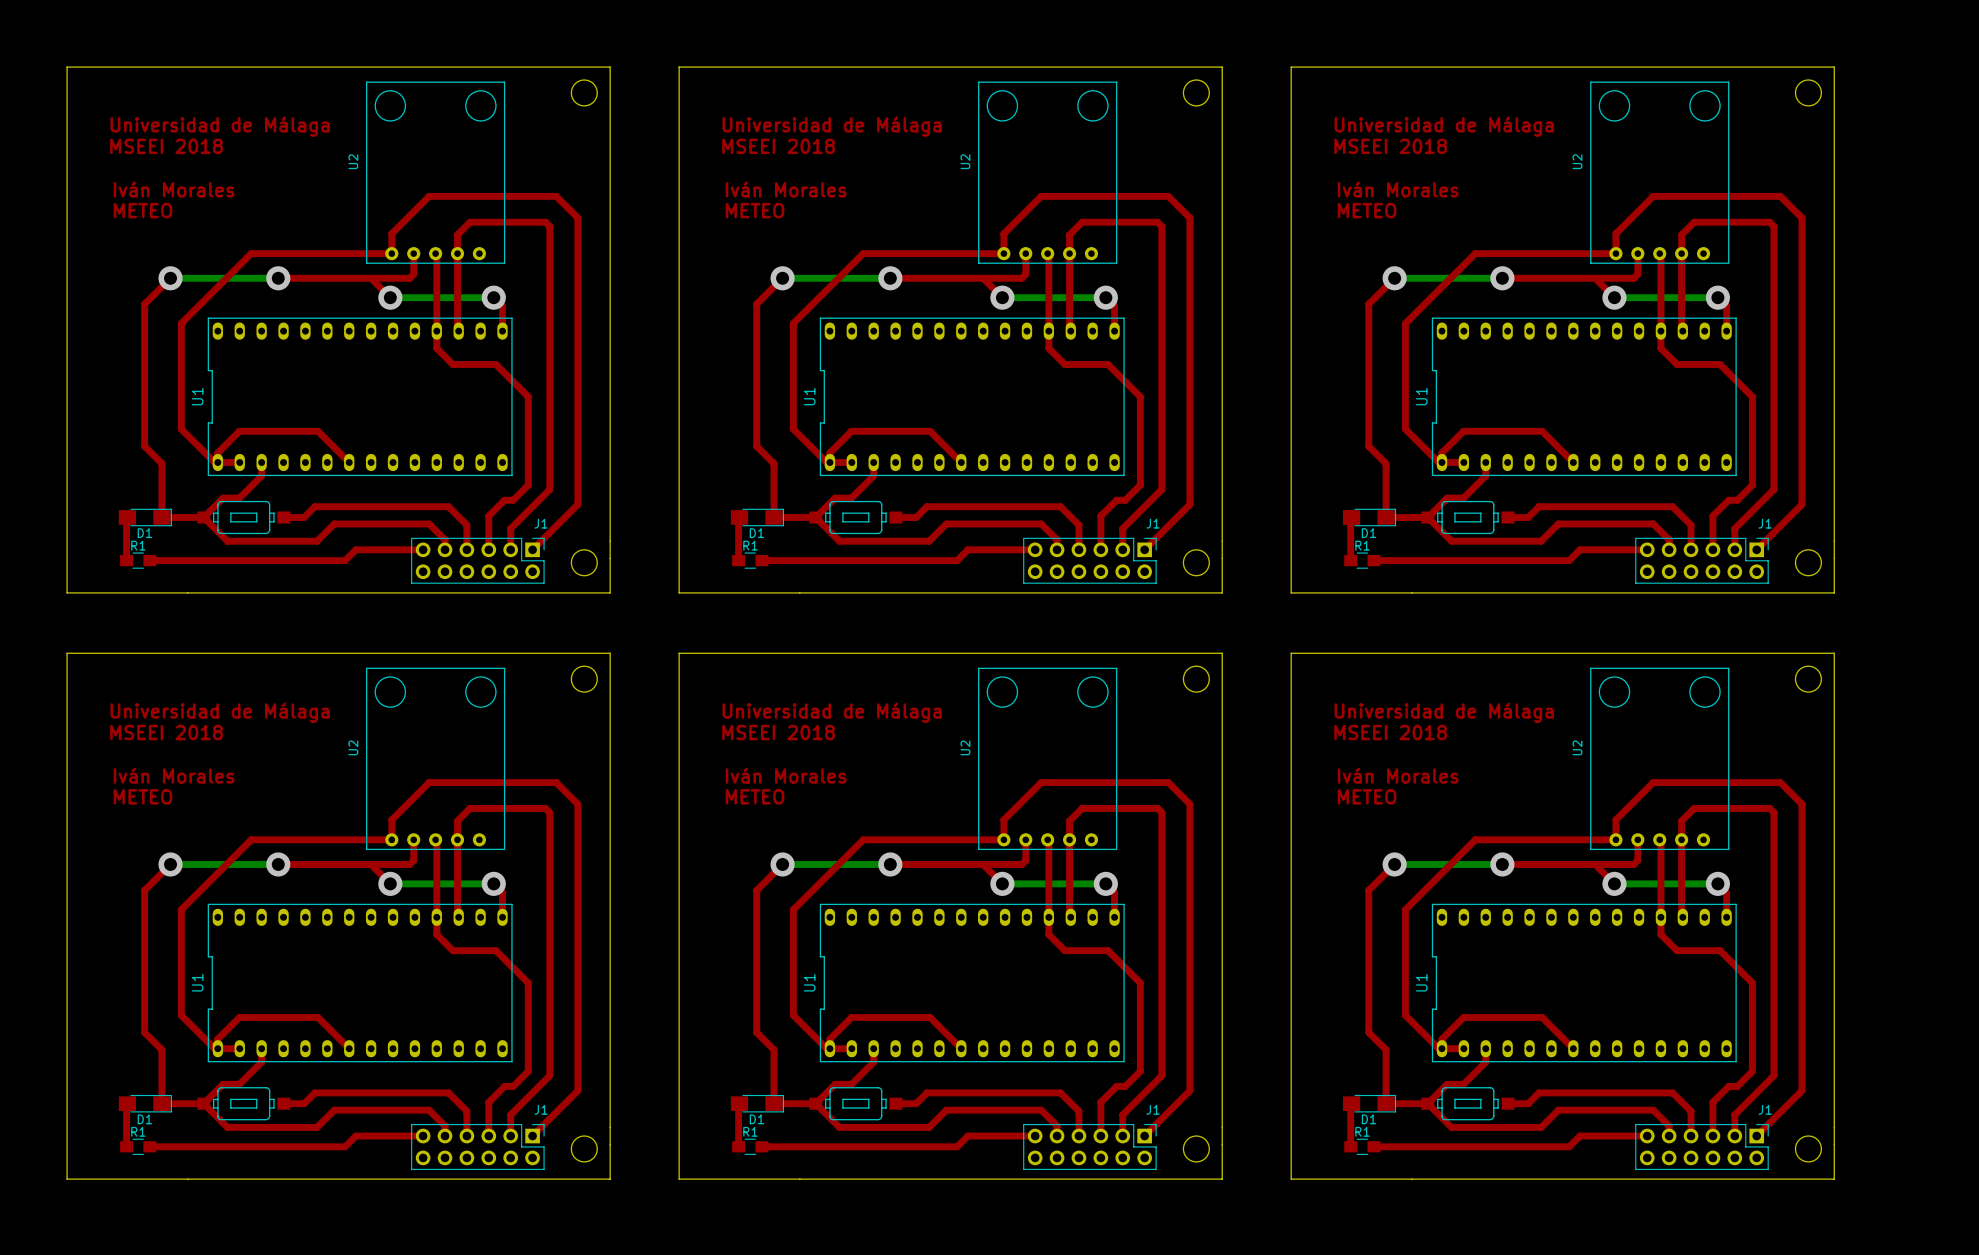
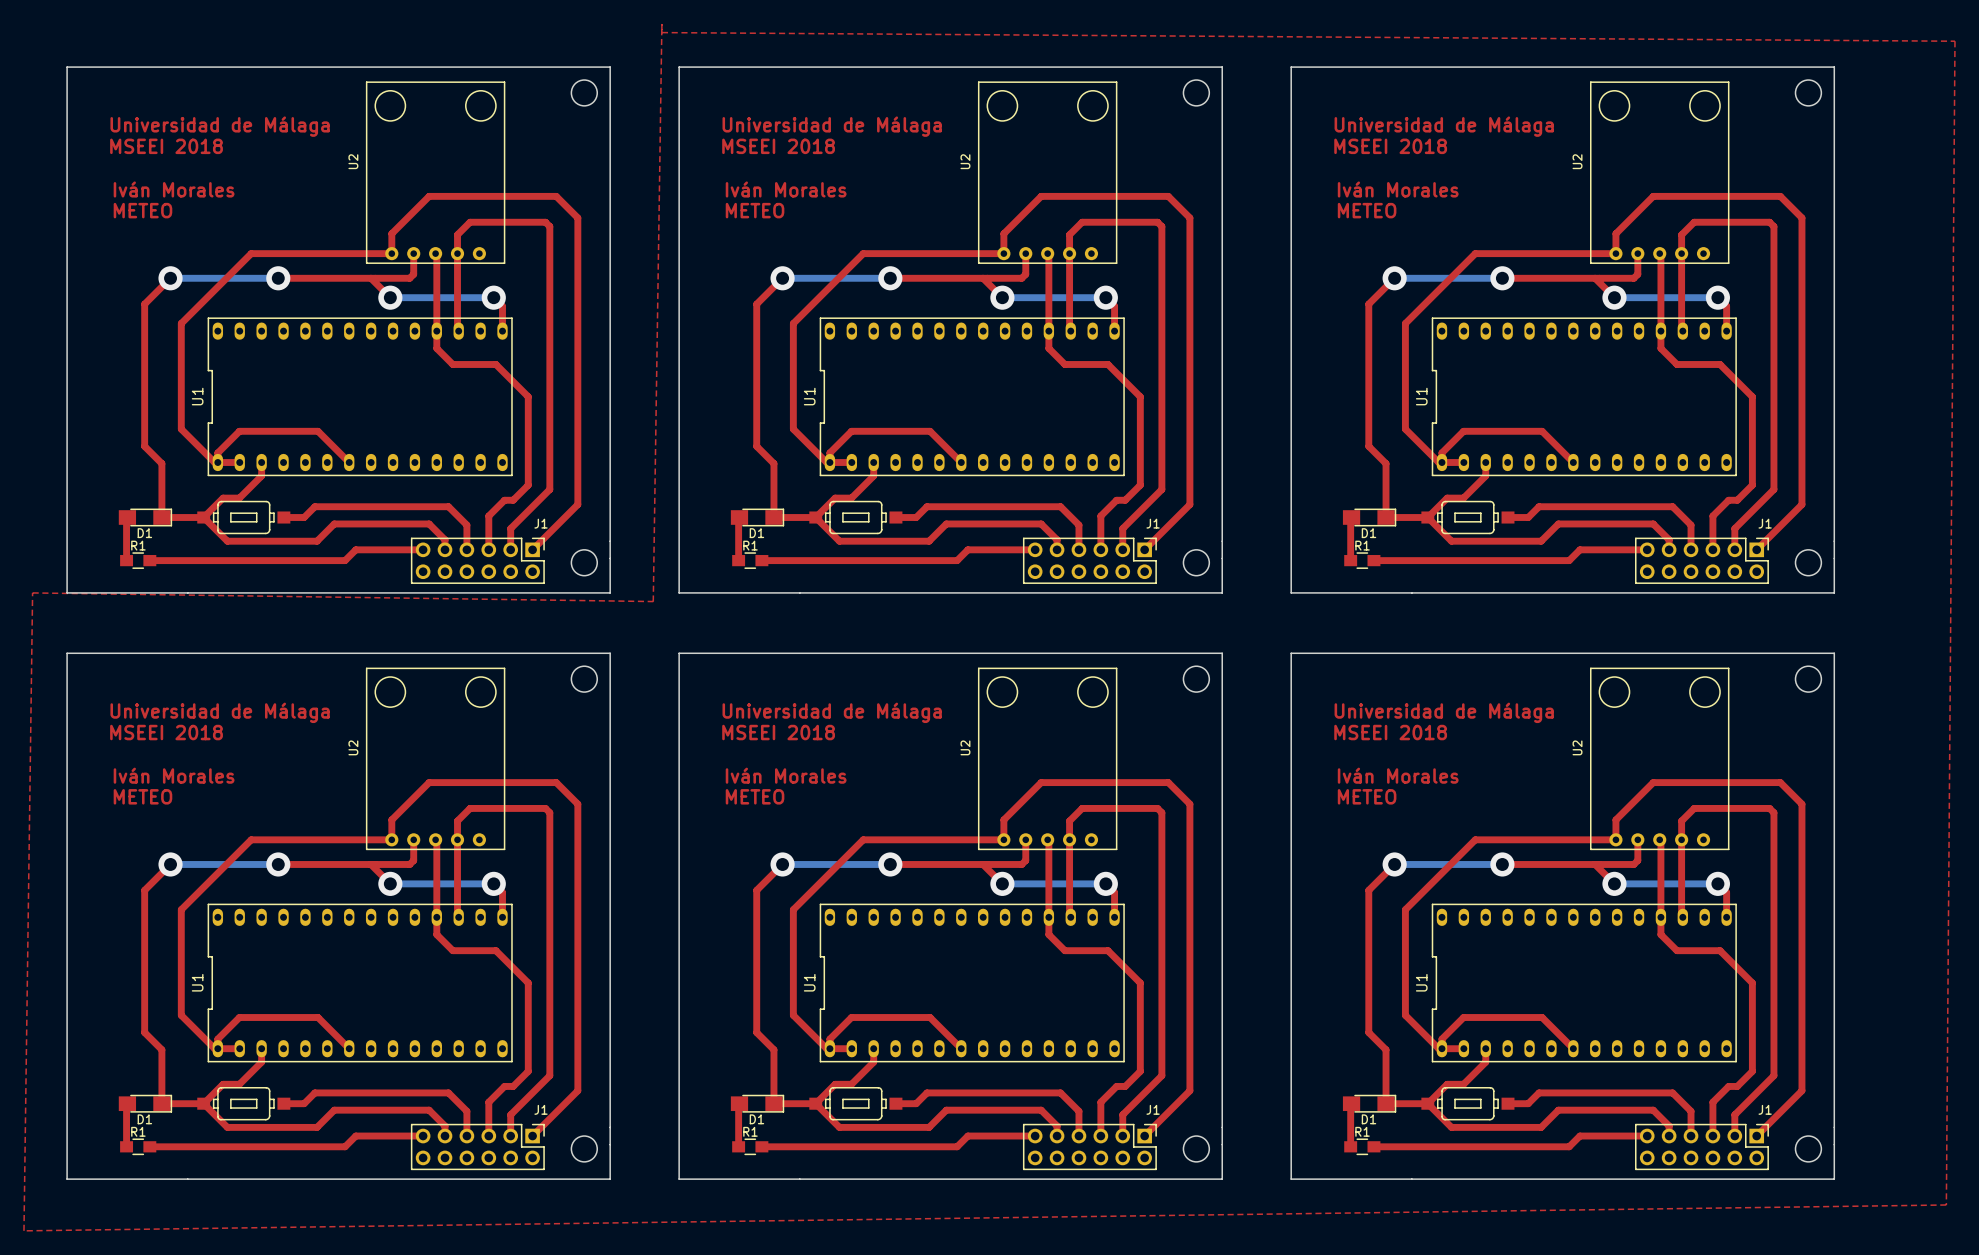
top zone outline: none -> (661, 23) (653, 601) (32, 592) (23, 1230) (1946, 1204) (1954, 41) (661, 32) (661, 23)

